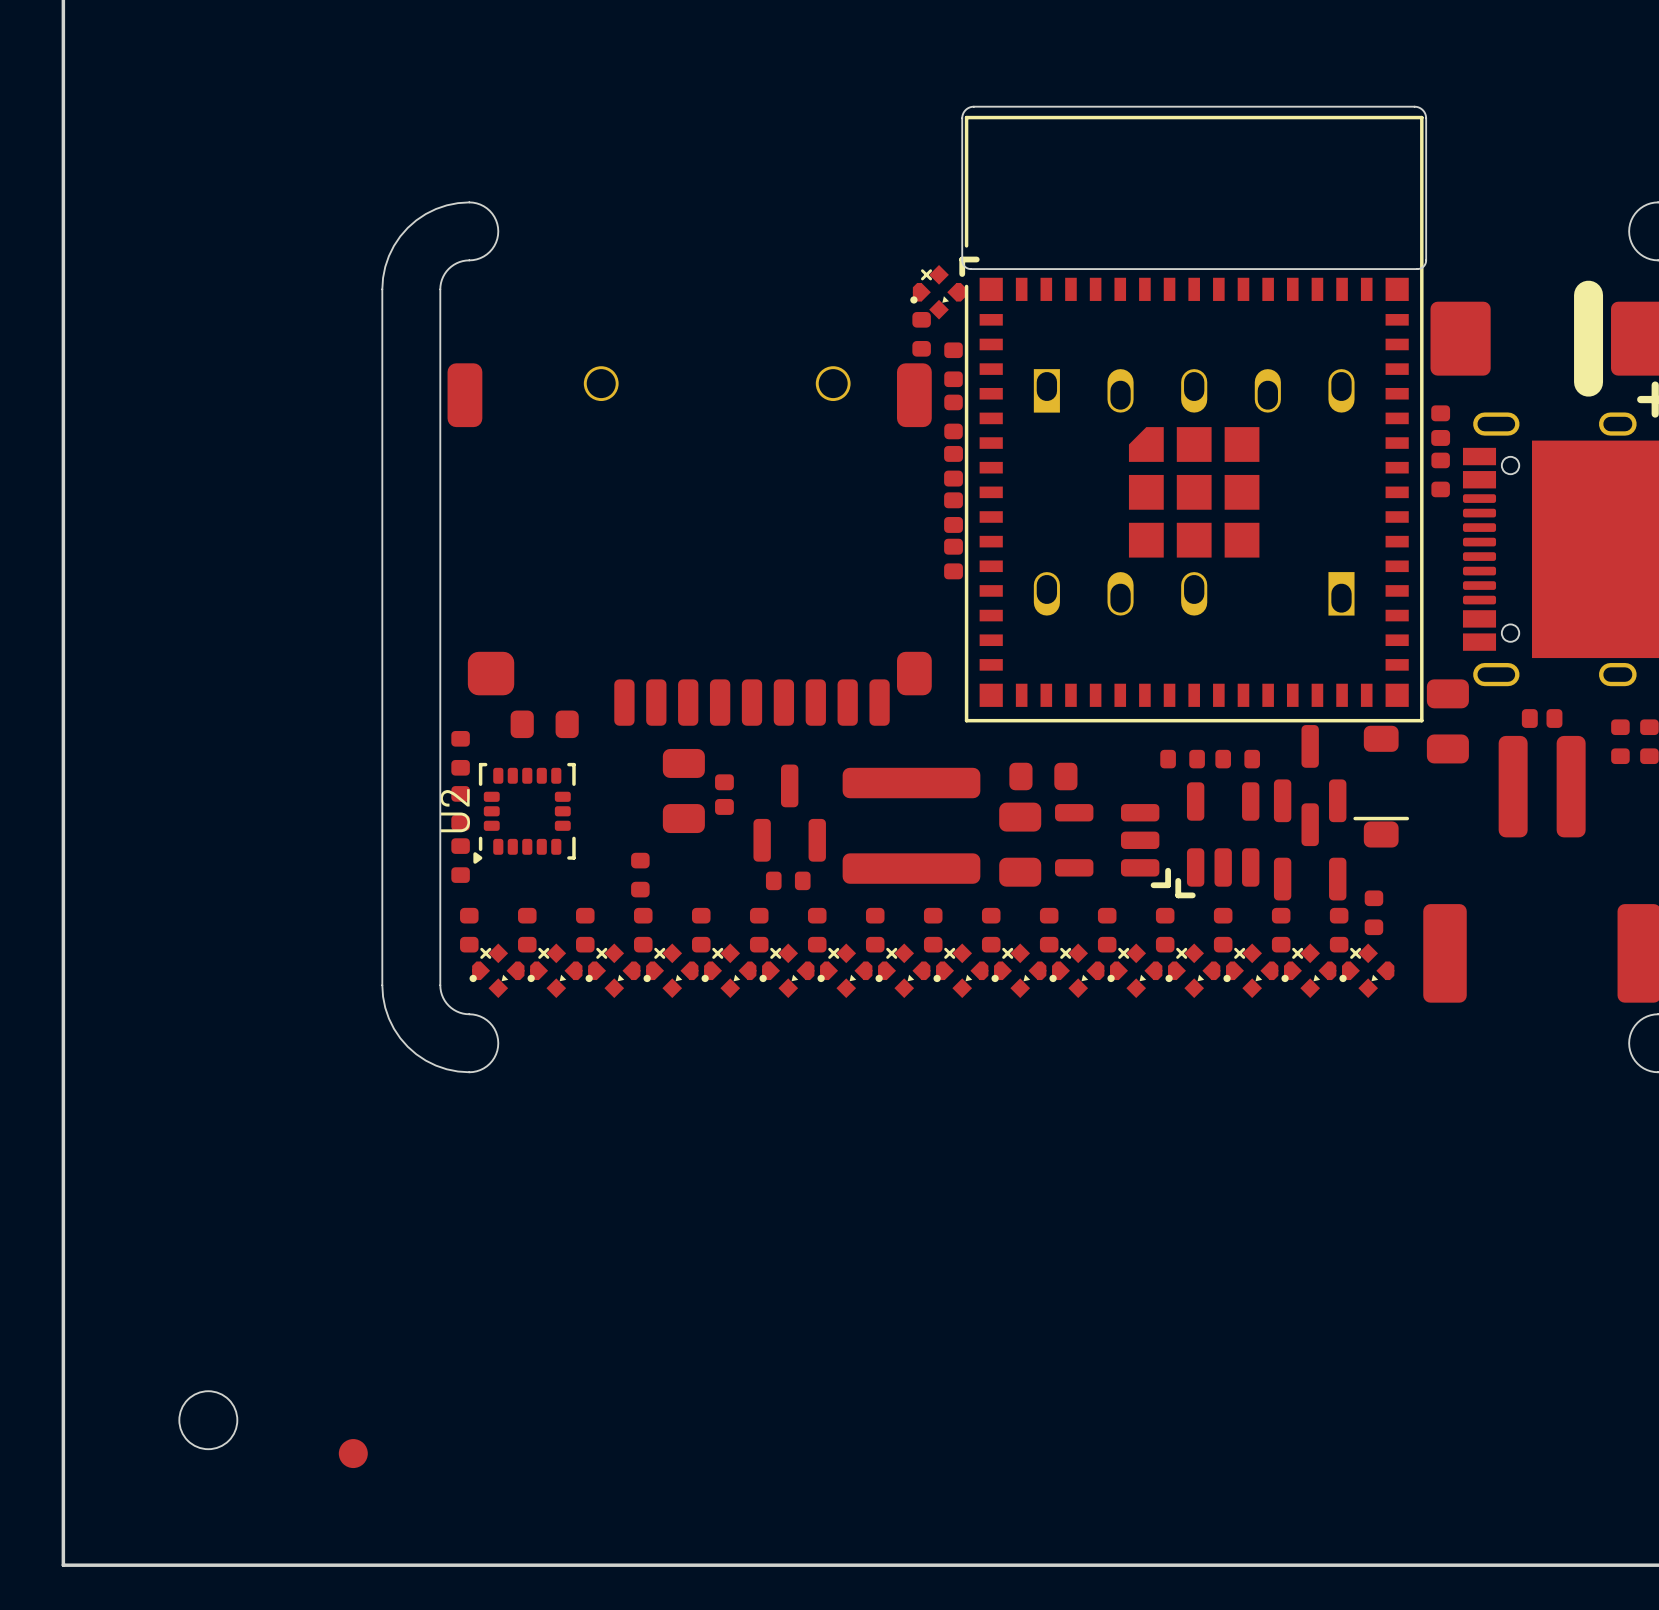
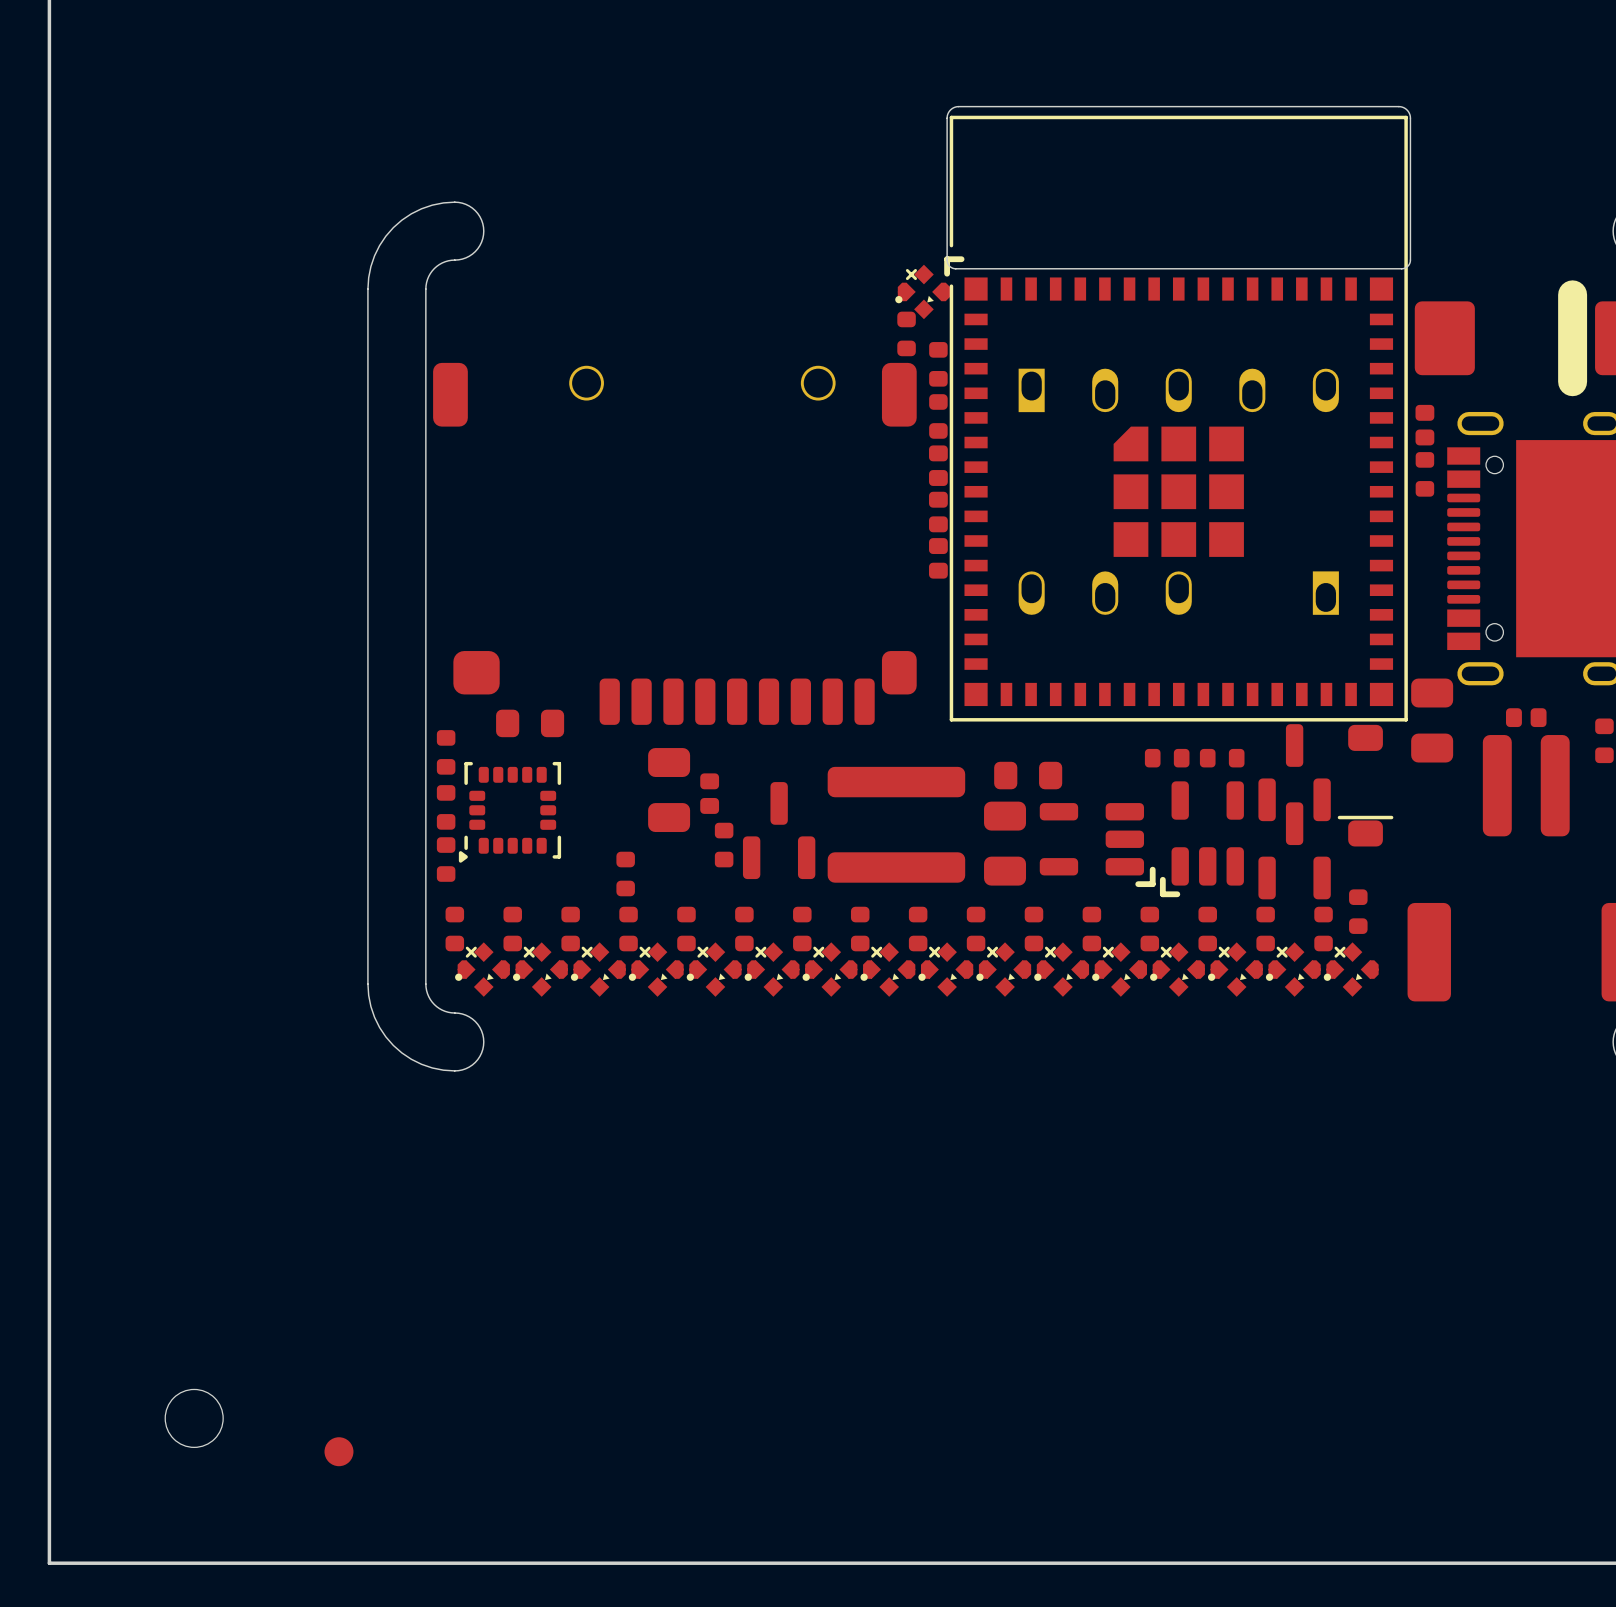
U2 name: U2 (455, 810) -> none
part position: (789, 813) -> (779, 830)
part rotation: 0° (788, 880) -> 90° clockwise (724, 845)
part position: (788, 880) -> (724, 845)

